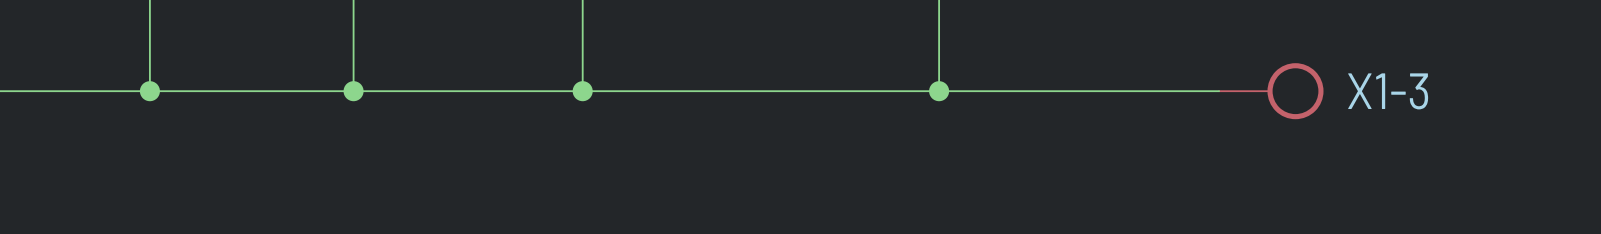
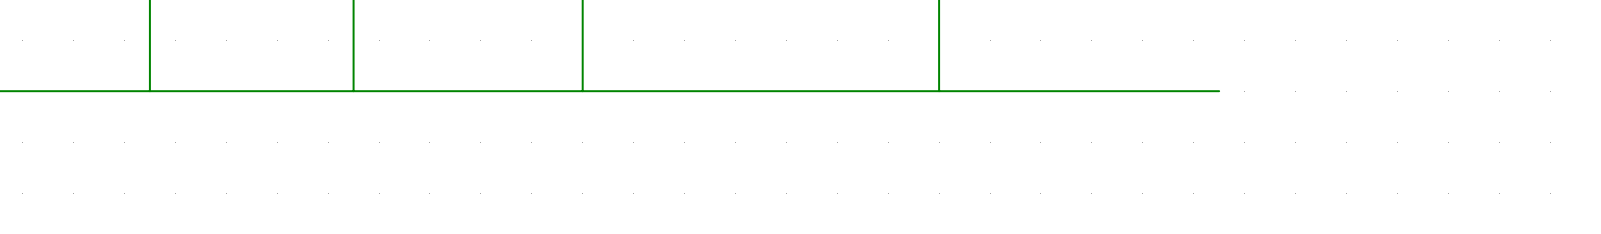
junction: (149, 91) -> none
junction: (353, 91) -> none
junction: (582, 91) -> none
junction: (939, 91) -> none
X1-3: (1271, 91) -> none

